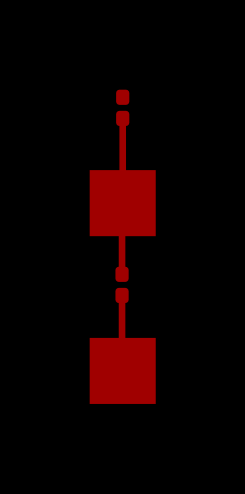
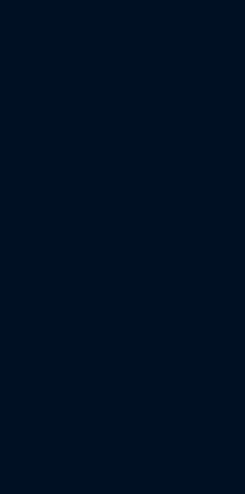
part: (122, 107) -> none
top track: (122, 118) (122, 274) -> none
part: (122, 203) -> none
part: (122, 284) -> none
top track: (122, 295) (122, 370) -> none
part: (122, 370) -> none

